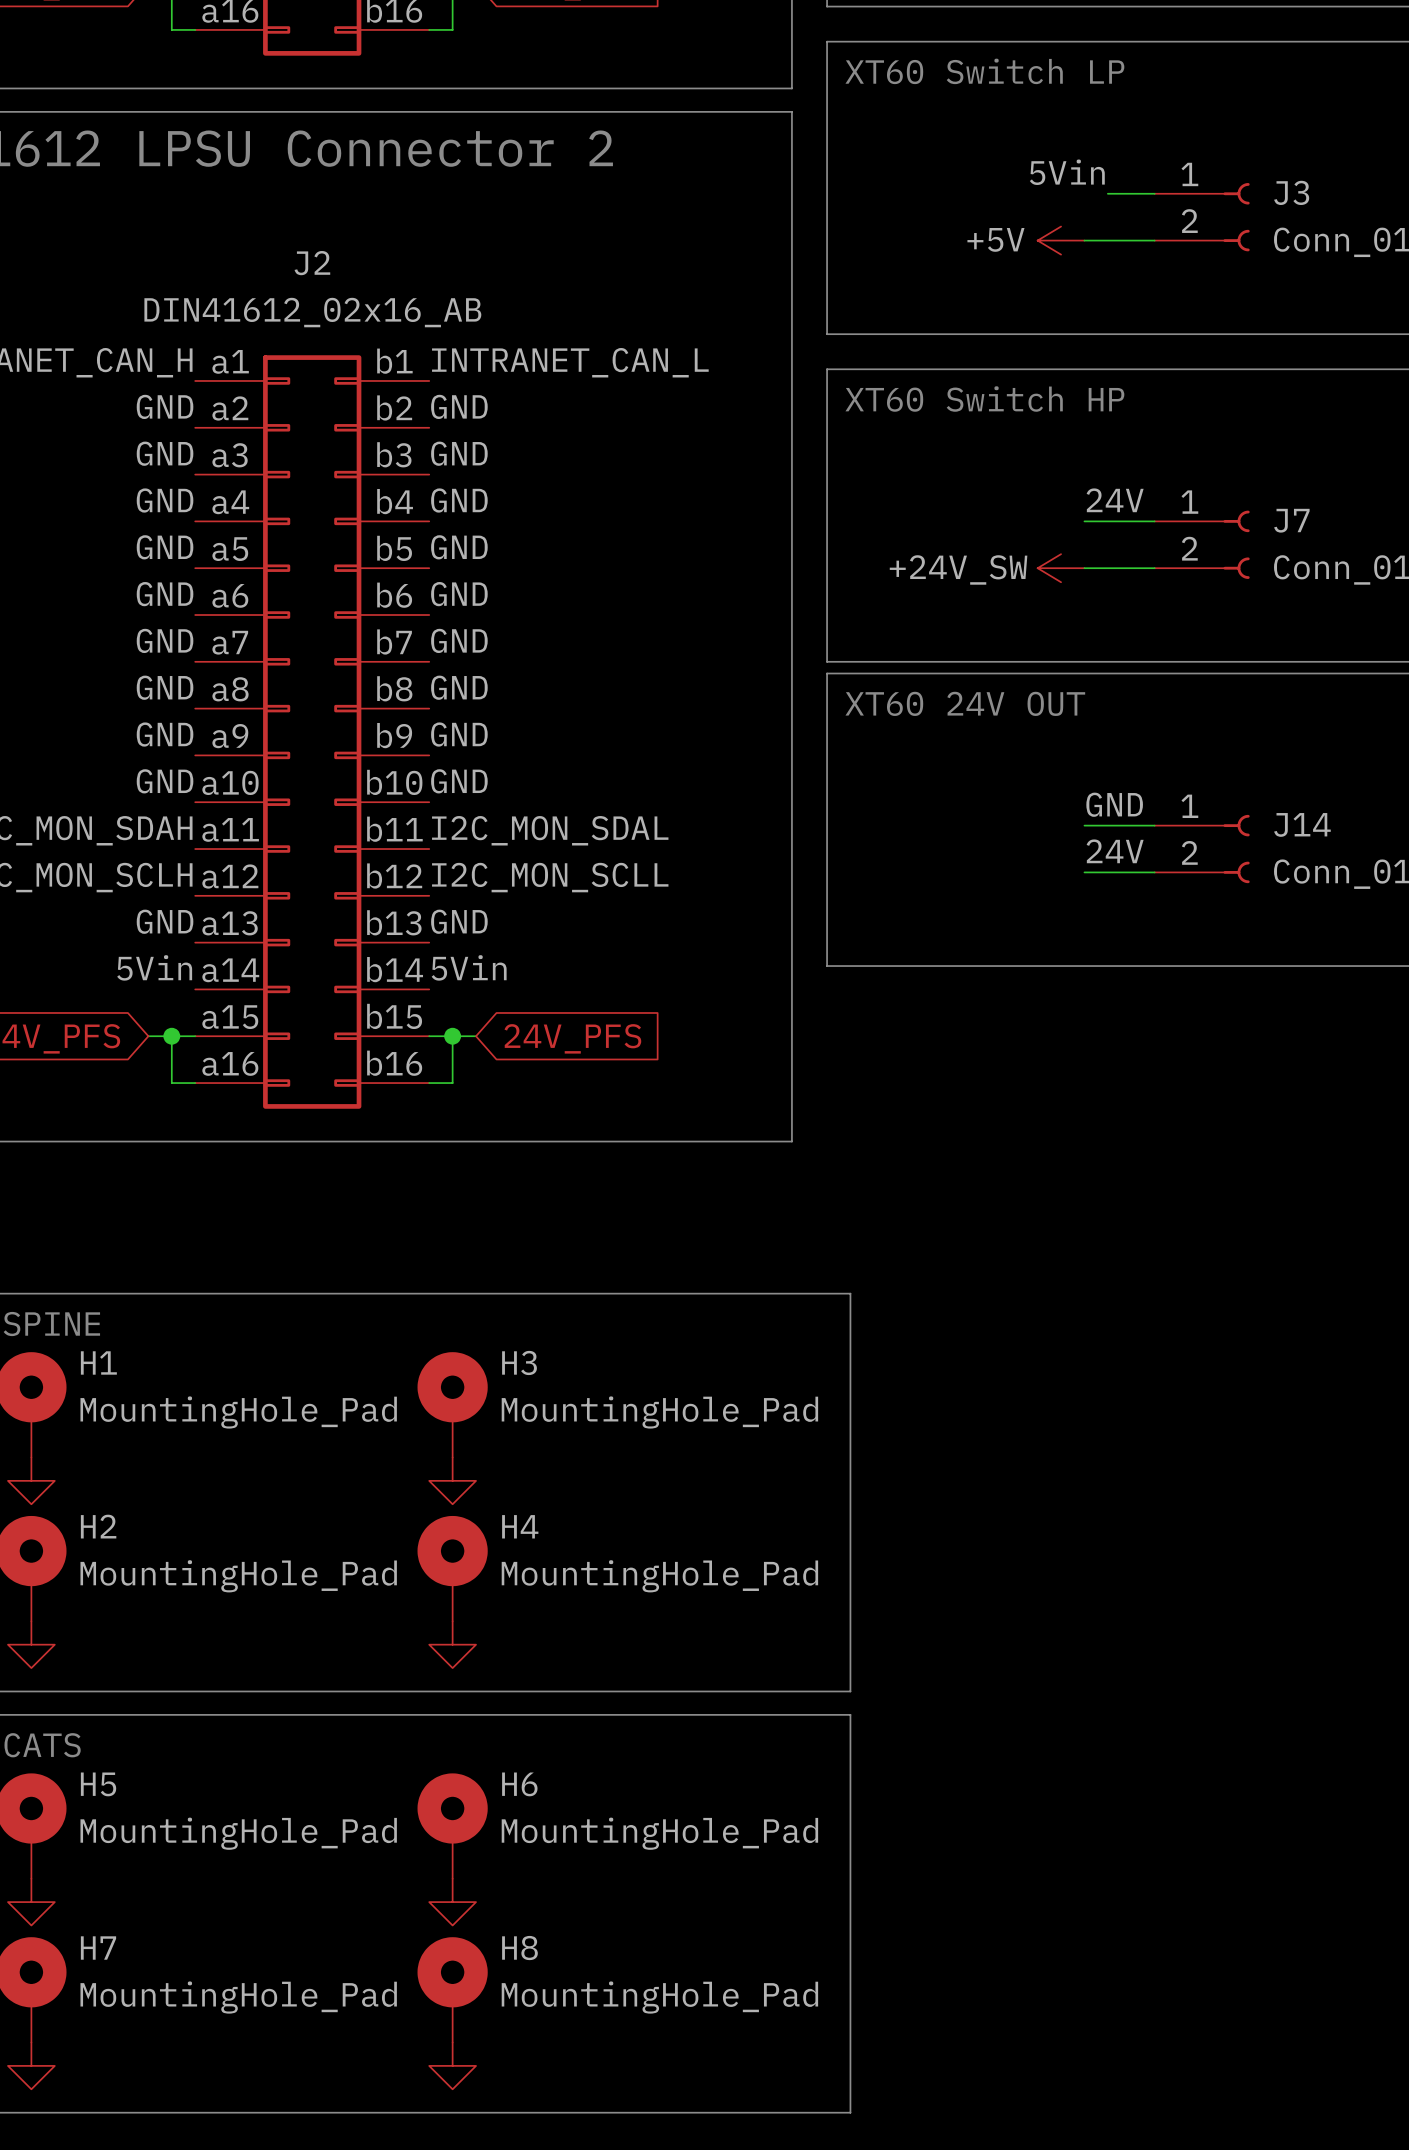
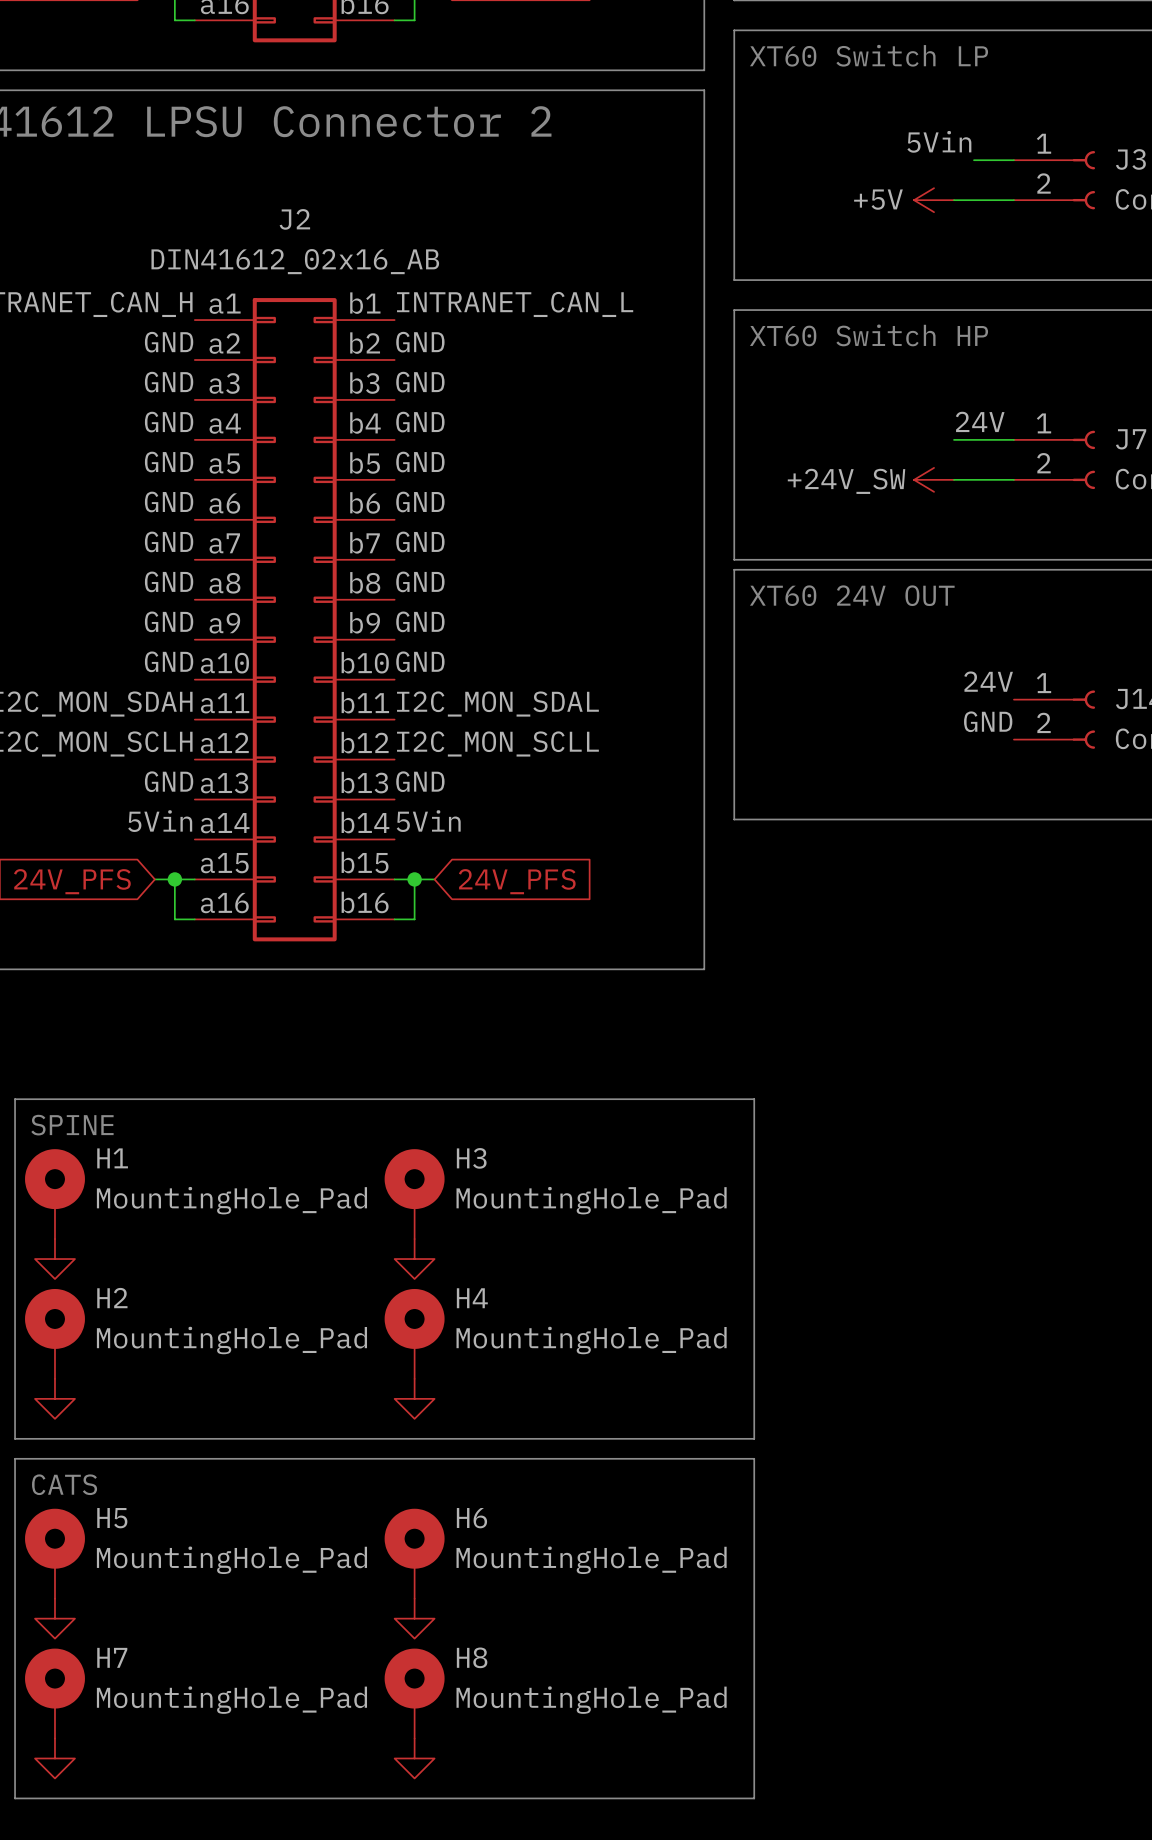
label position: GND (1114, 804) -> GND (988, 721)
wire: (1084, 825) (1154, 825) -> none
label position: 24V (1115, 851) -> 24V (988, 681)
wire: (1084, 872) (1154, 872) -> none

